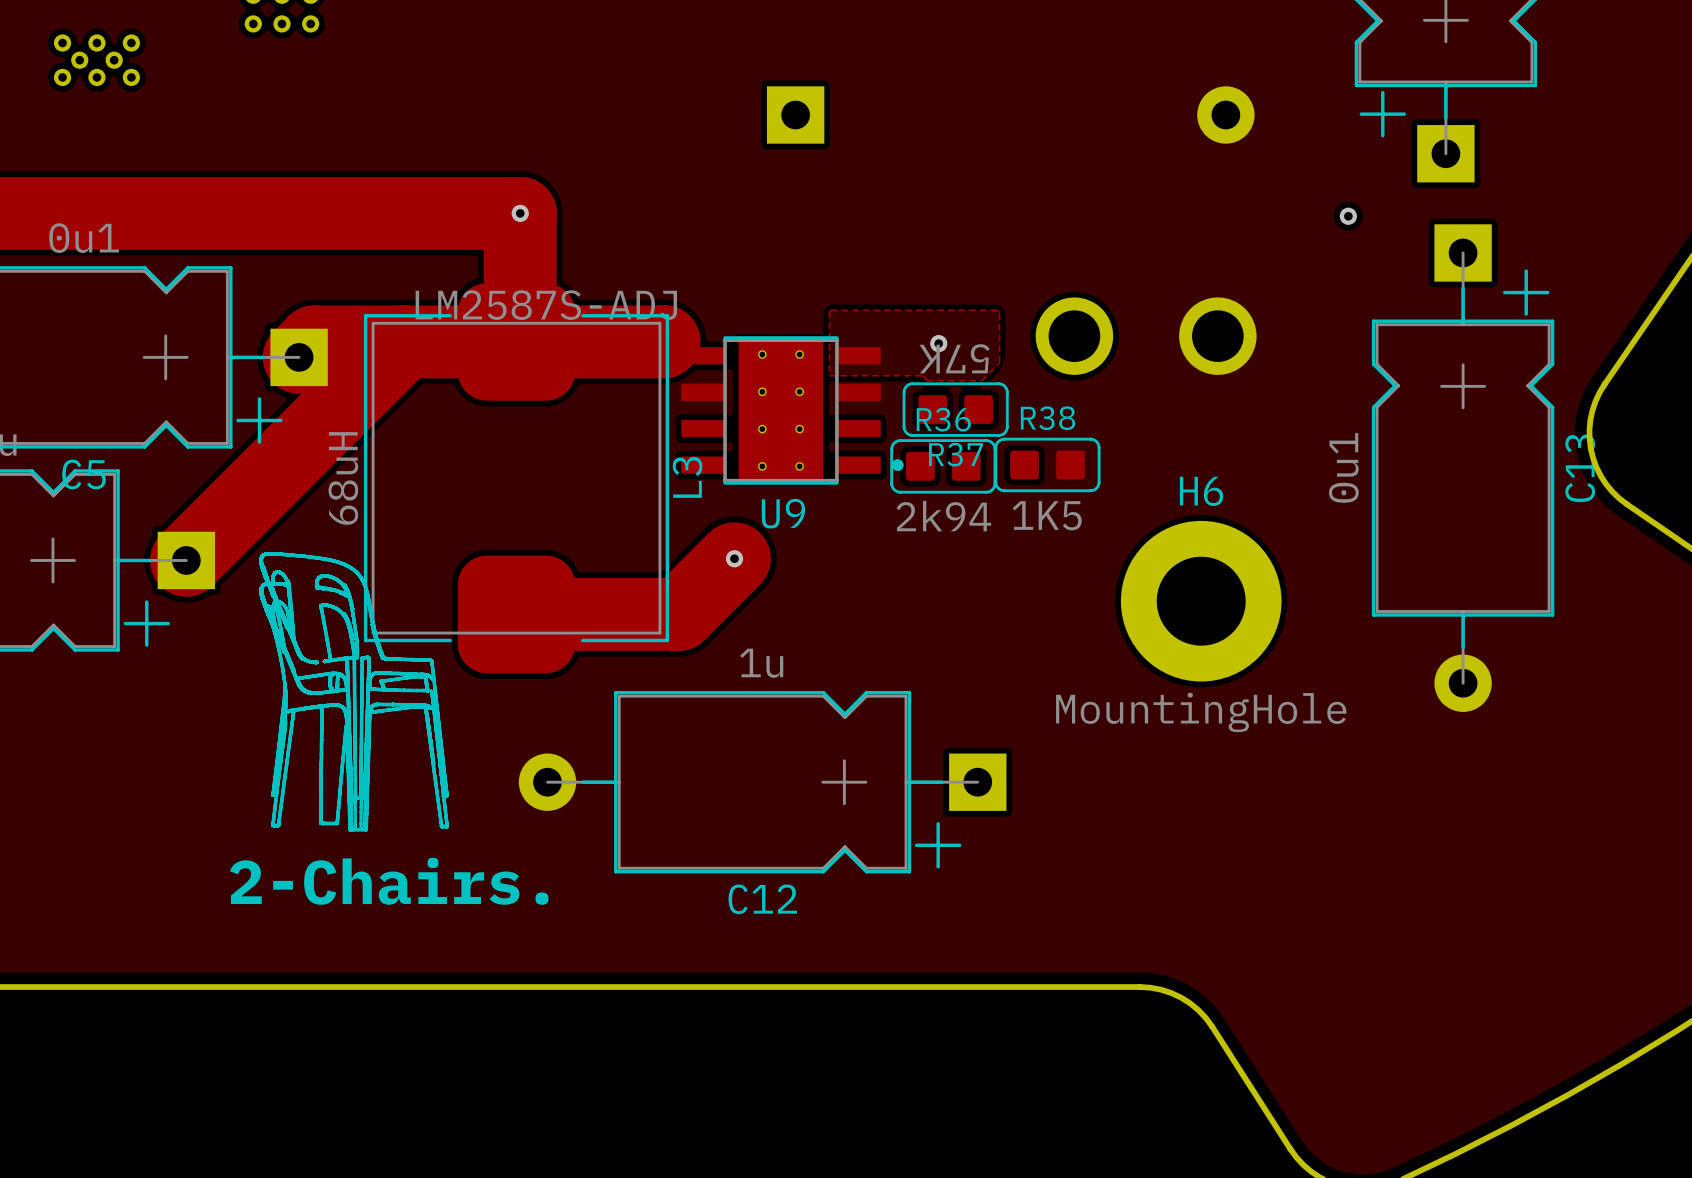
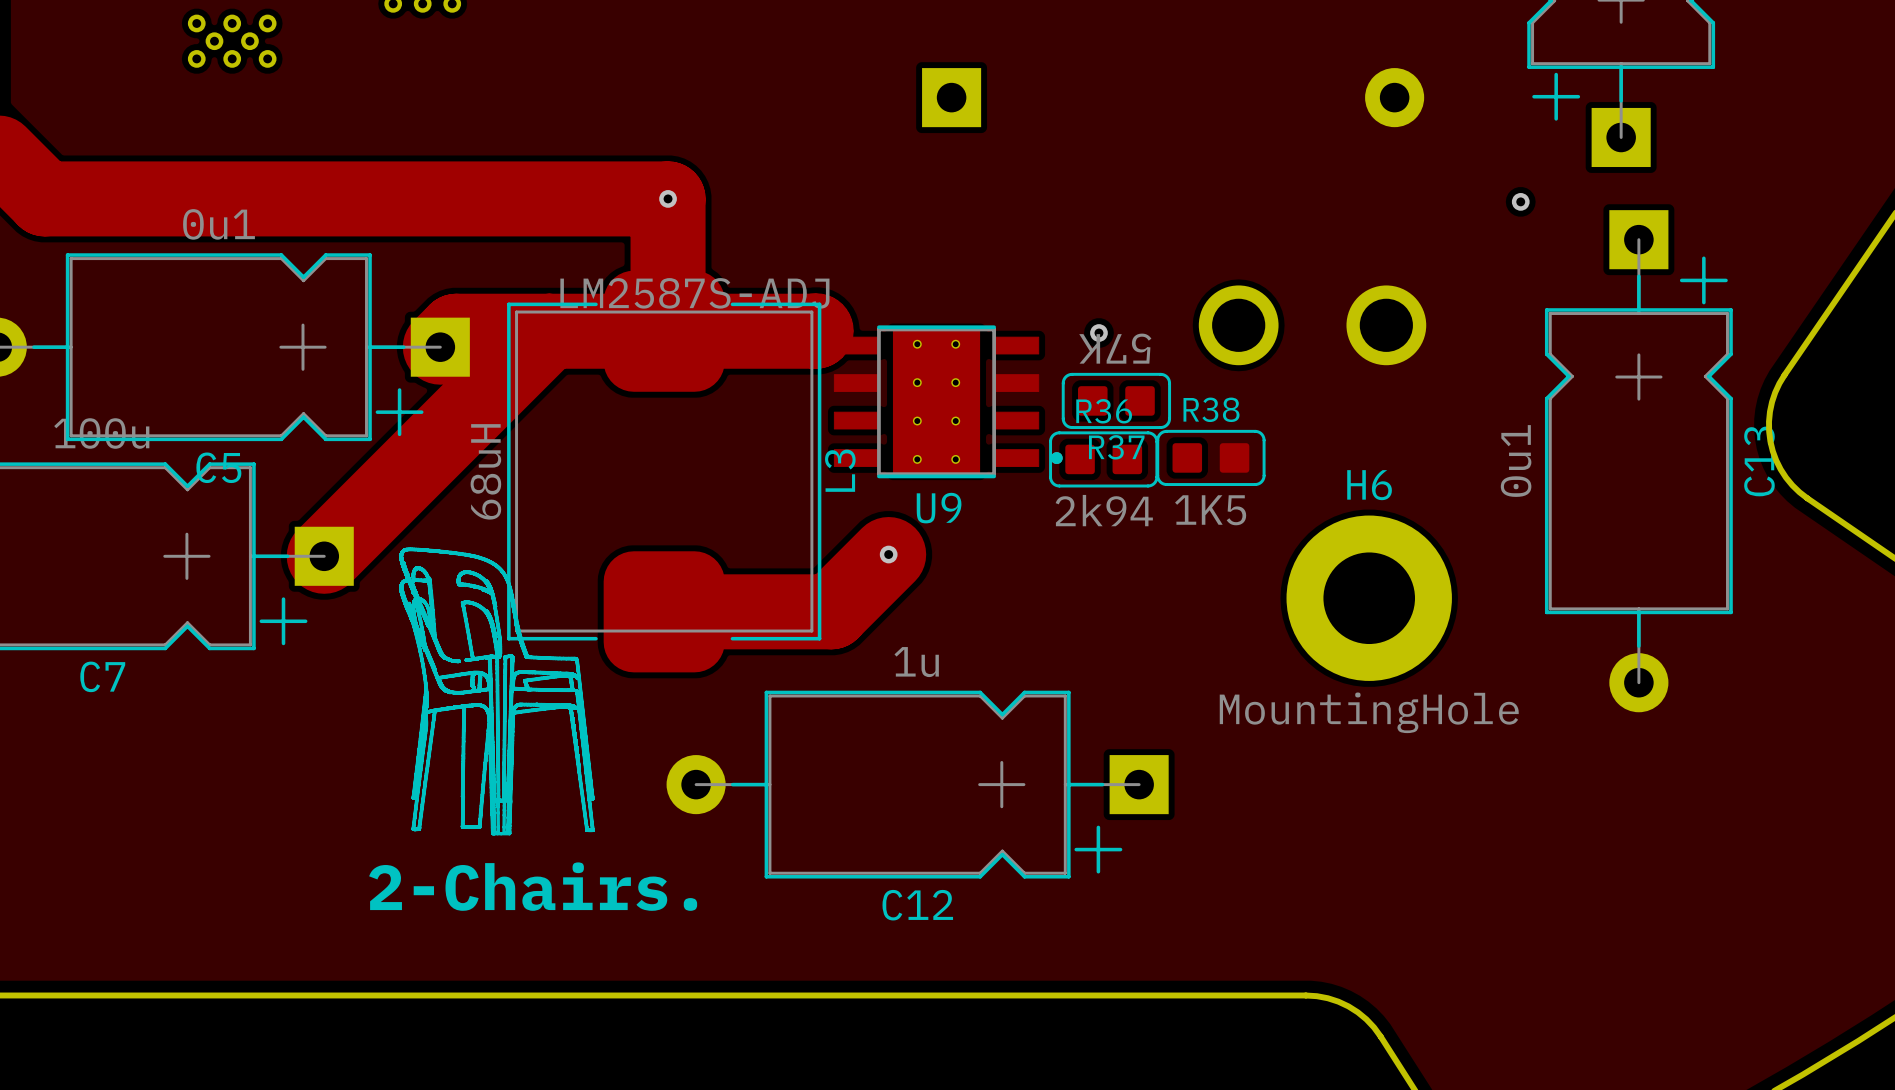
zone outline: (829, 375) (830, 310) (997, 310) (999, 312) (999, 362) (981, 380) (926, 380) -> none
zone outline: (829, 375) (922, 375) (926, 380) -> none

